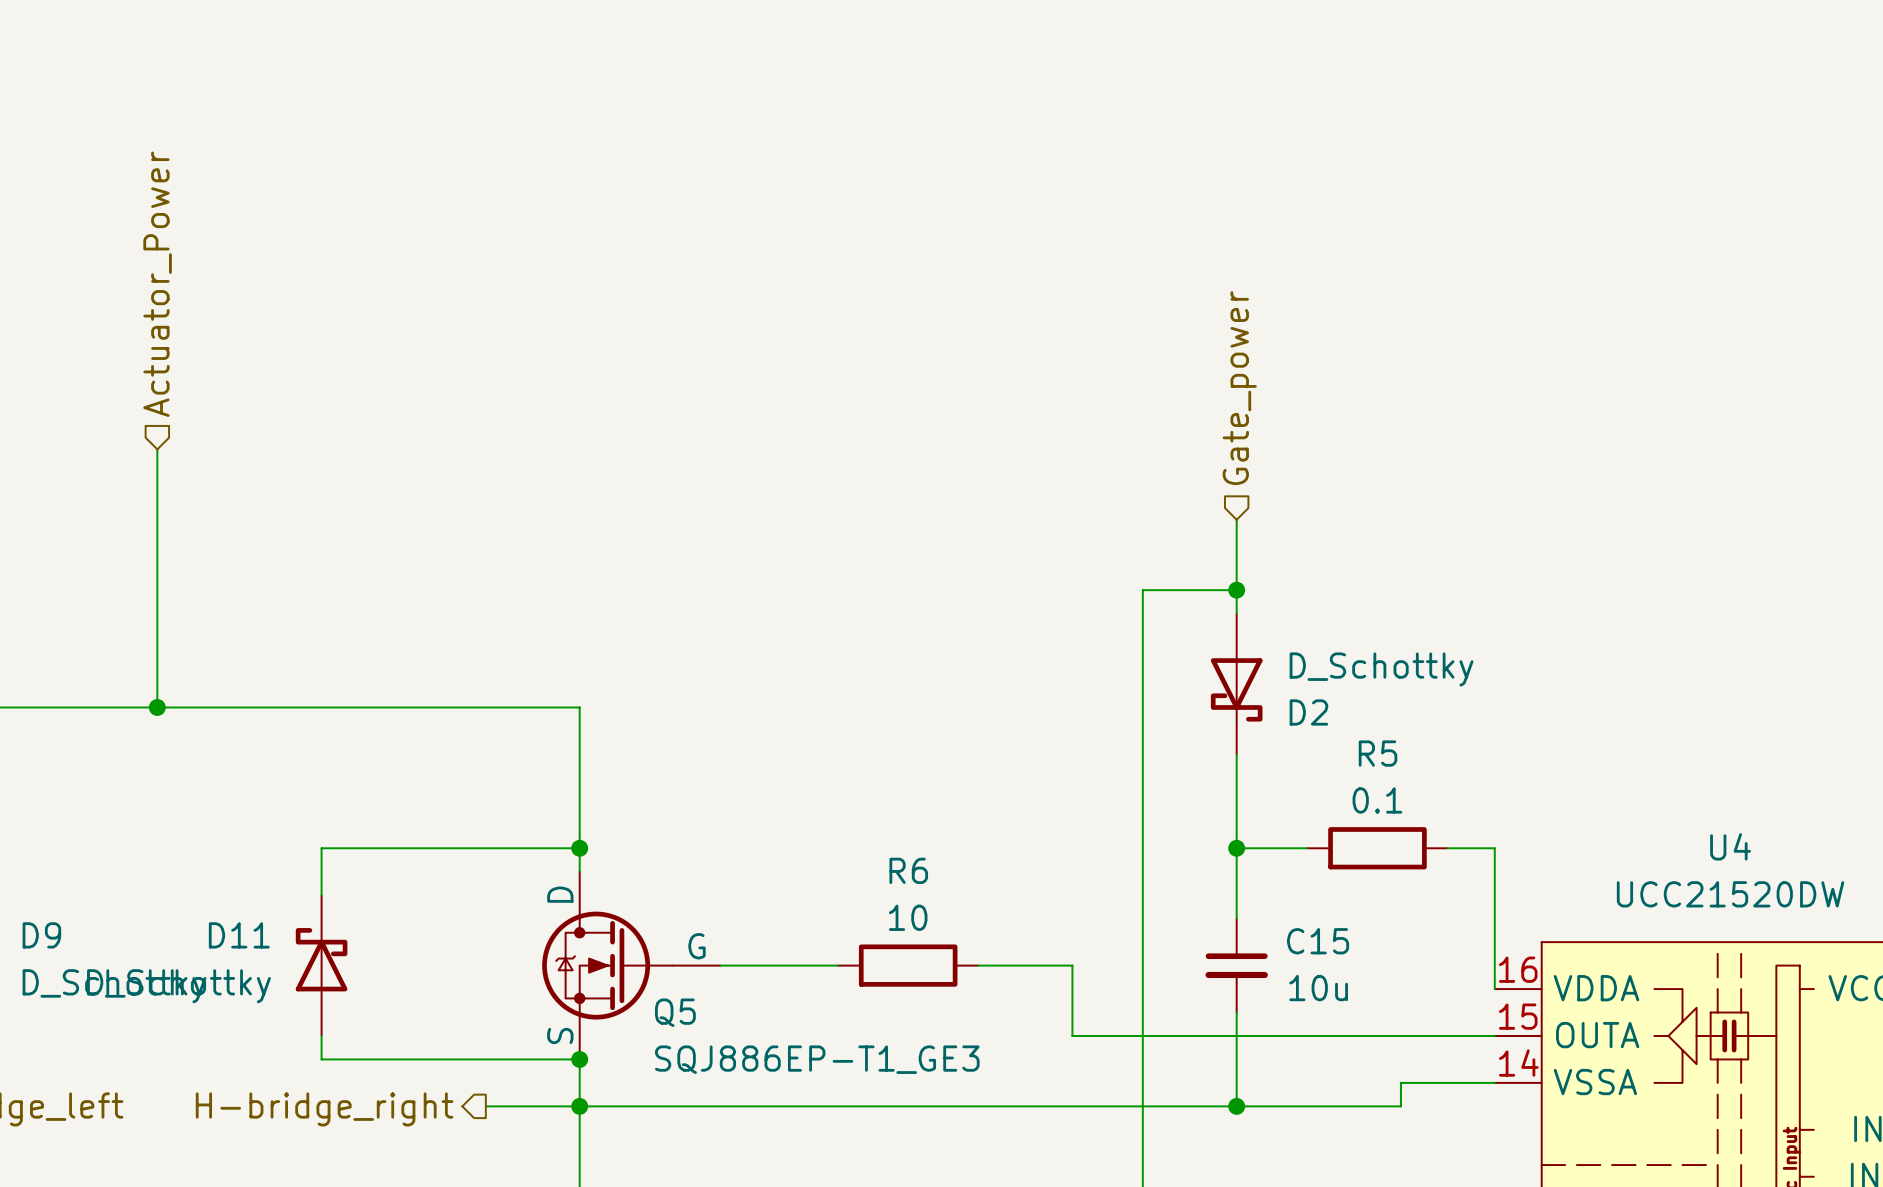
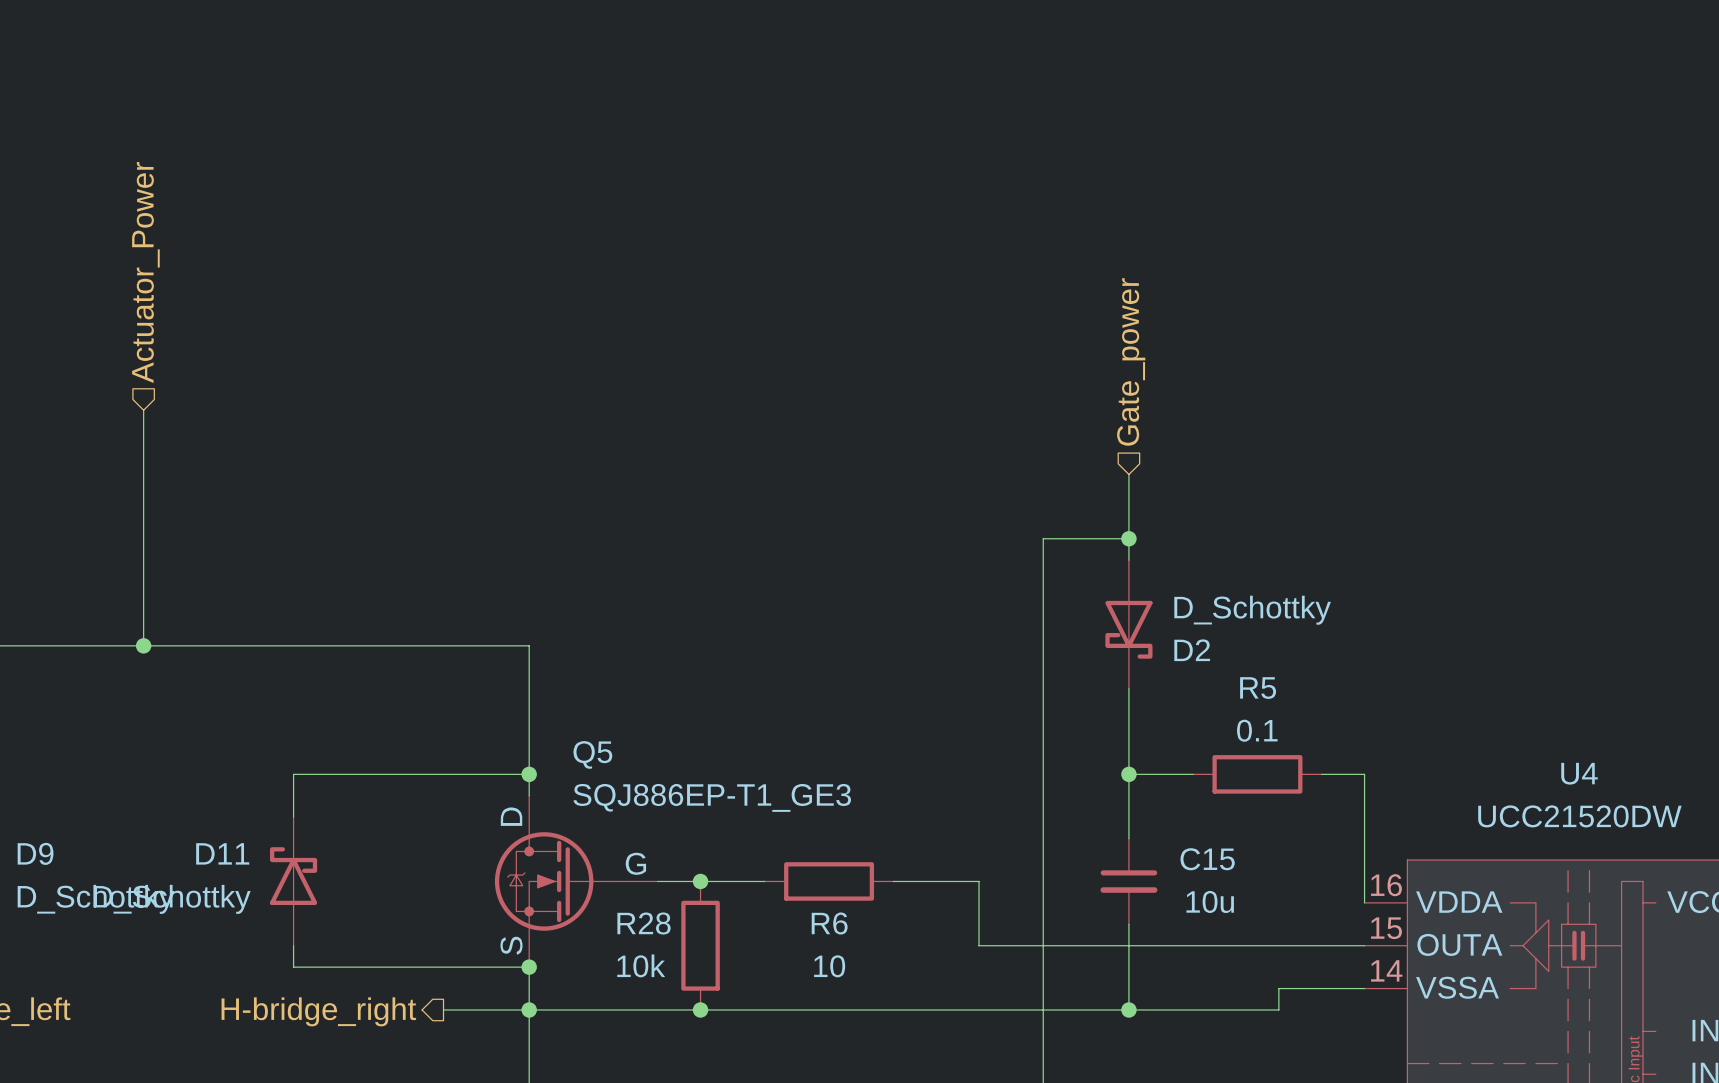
R6 name position: R6 (908, 870) -> R6 (829, 923)
R6 value position: 10 (908, 917) -> 10 (829, 966)
junction: none -> (700, 881)
Q5 name position: Q5 (675, 1012) -> Q5 (592, 754)
R28: none -> 10k (700, 945)
Q5 value position: SQJ886EP-T1_GE3 (817, 1059) -> SQJ886EP-T1_GE3 (712, 797)
junction: none -> (700, 1009)

